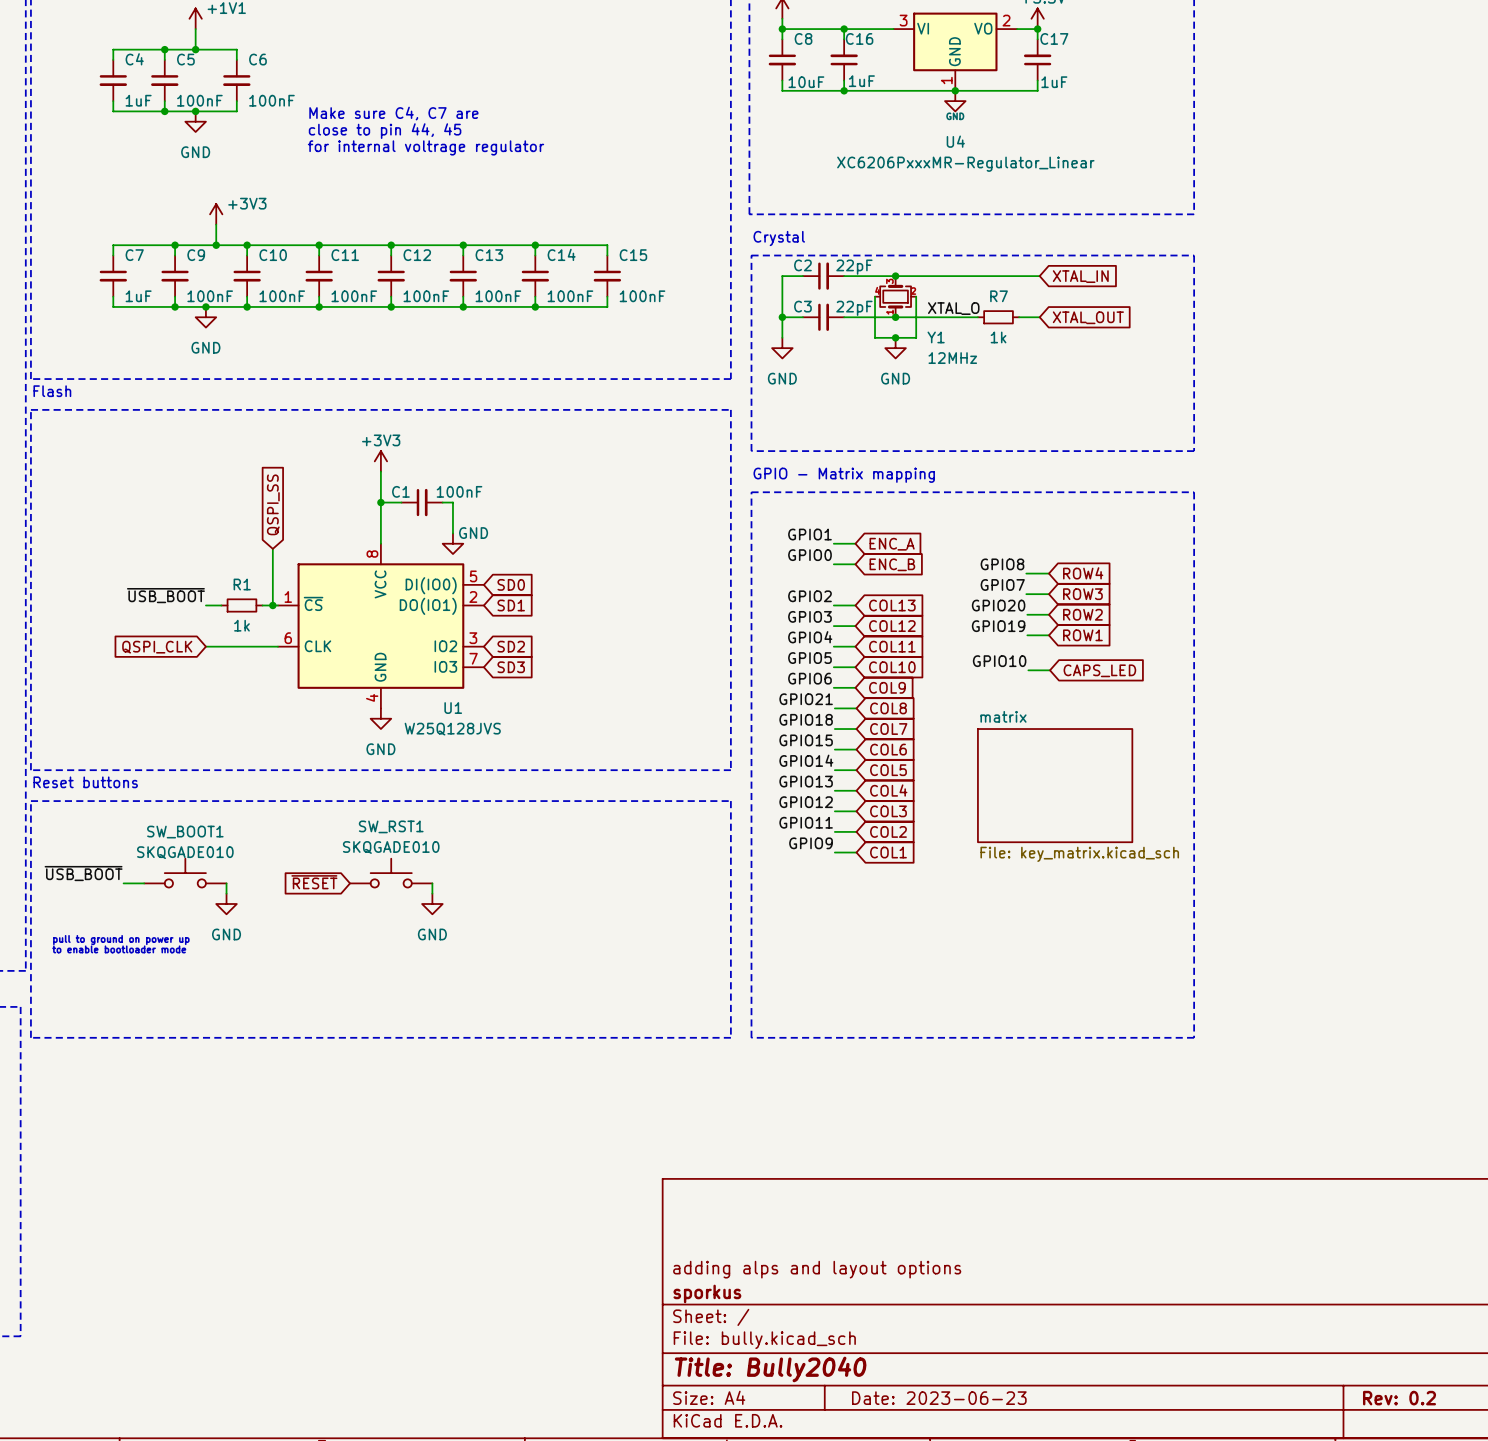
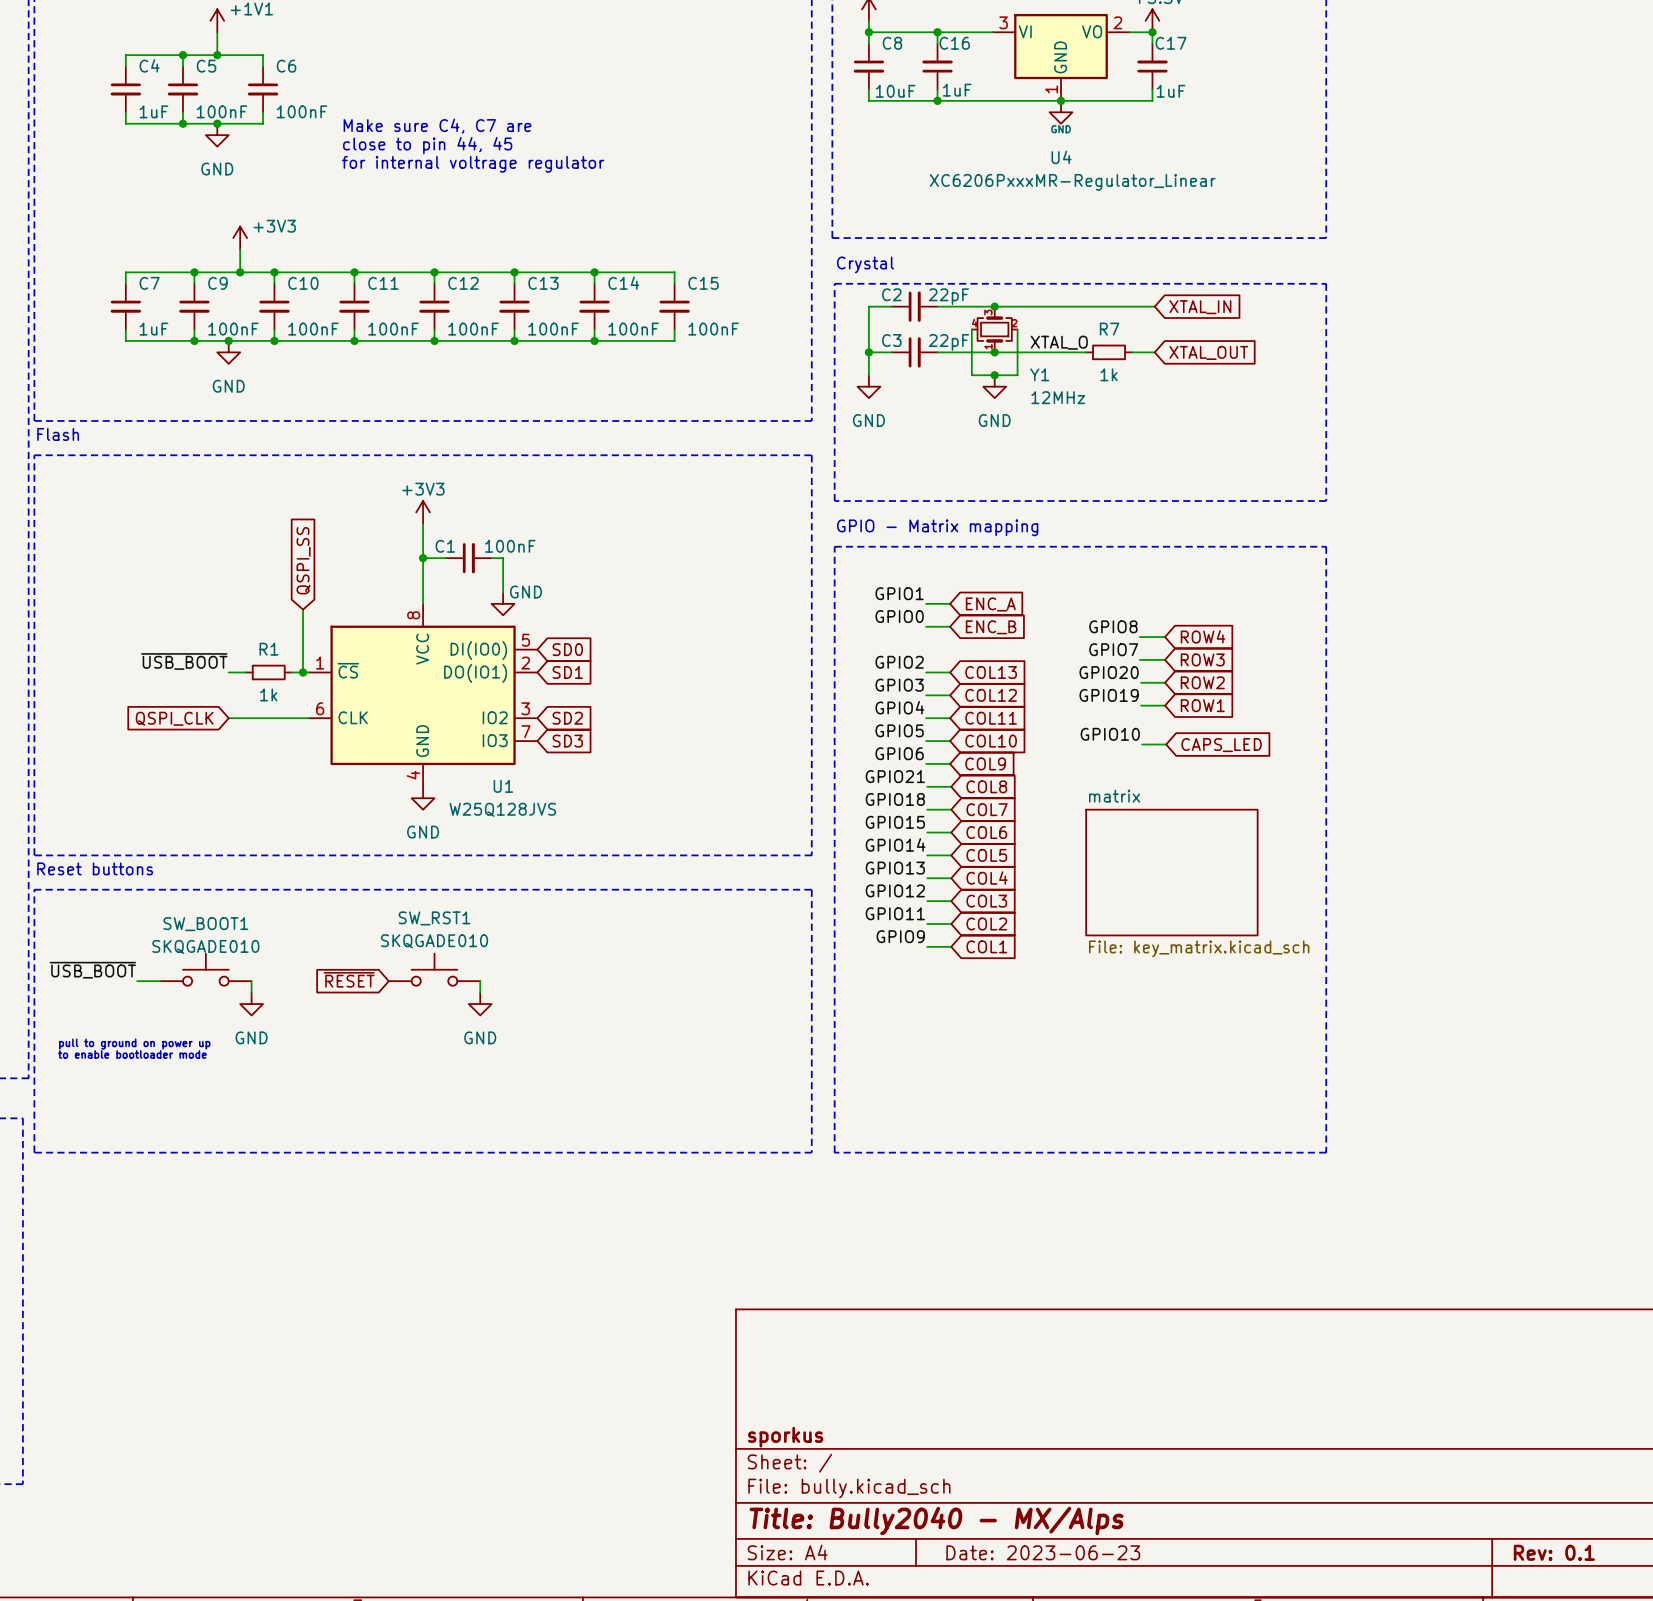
title block: adding alps and layout options (817, 1269) -> none
title block: Title: Bully2040 (770, 1369) -> Title: Bully2040 - MX/Alps (936, 1521)
title block: Rev: 0.2 (1399, 1398) -> Rev: 0.1 (1554, 1552)

